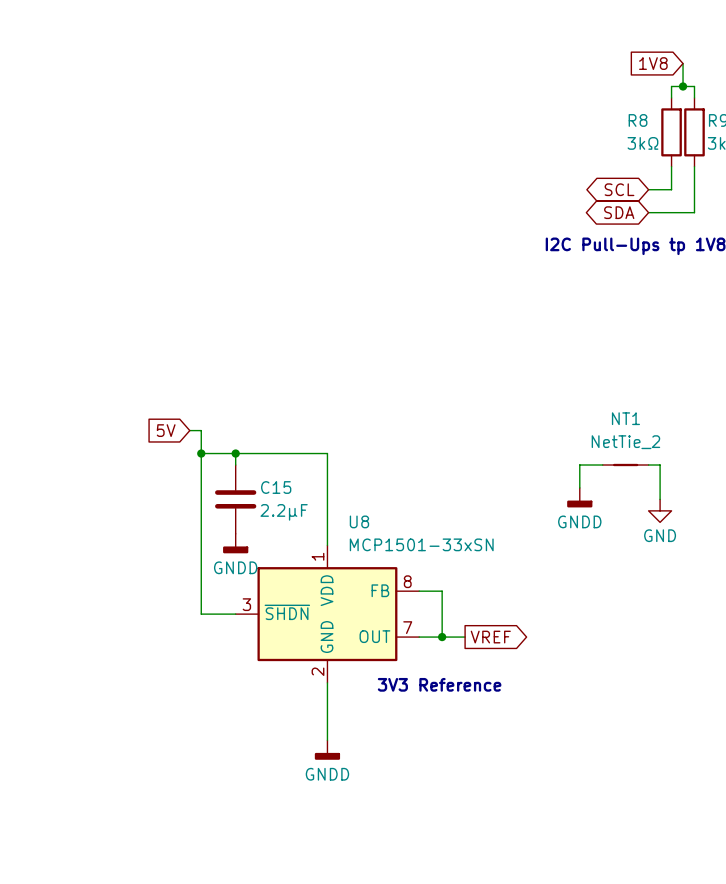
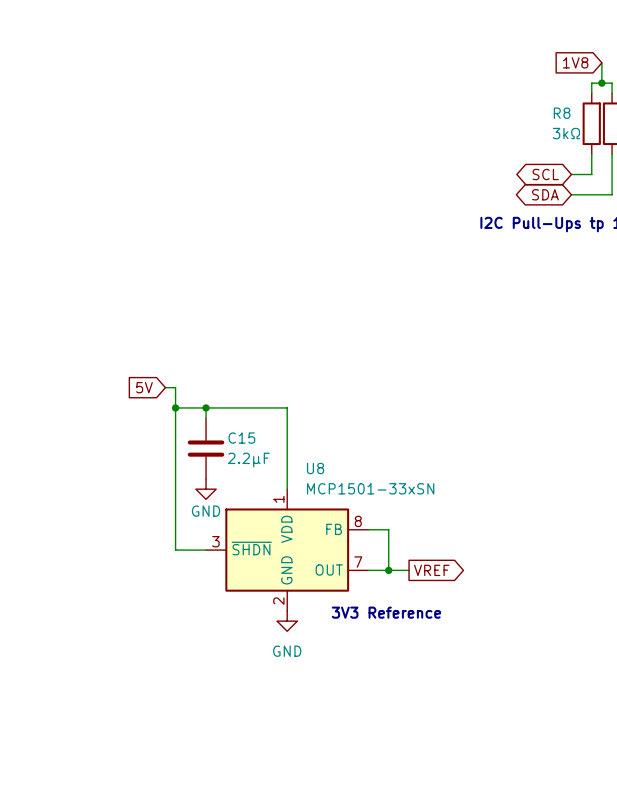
wire: (602, 465) (579, 465) (579, 487) -> none
NT1: NetTie_2 (625, 465) -> none
wire: (648, 465) (660, 465) (660, 499) -> none
power symbol: GNDD (579, 497) -> none
power symbol: GND (660, 510) -> none
power symbol: GNDD (235, 543) -> GND (206, 489)
wire: (327, 682) (327, 740) -> none
power symbol: none -> GND (287, 621)
power symbol: GNDD (327, 750) -> none

